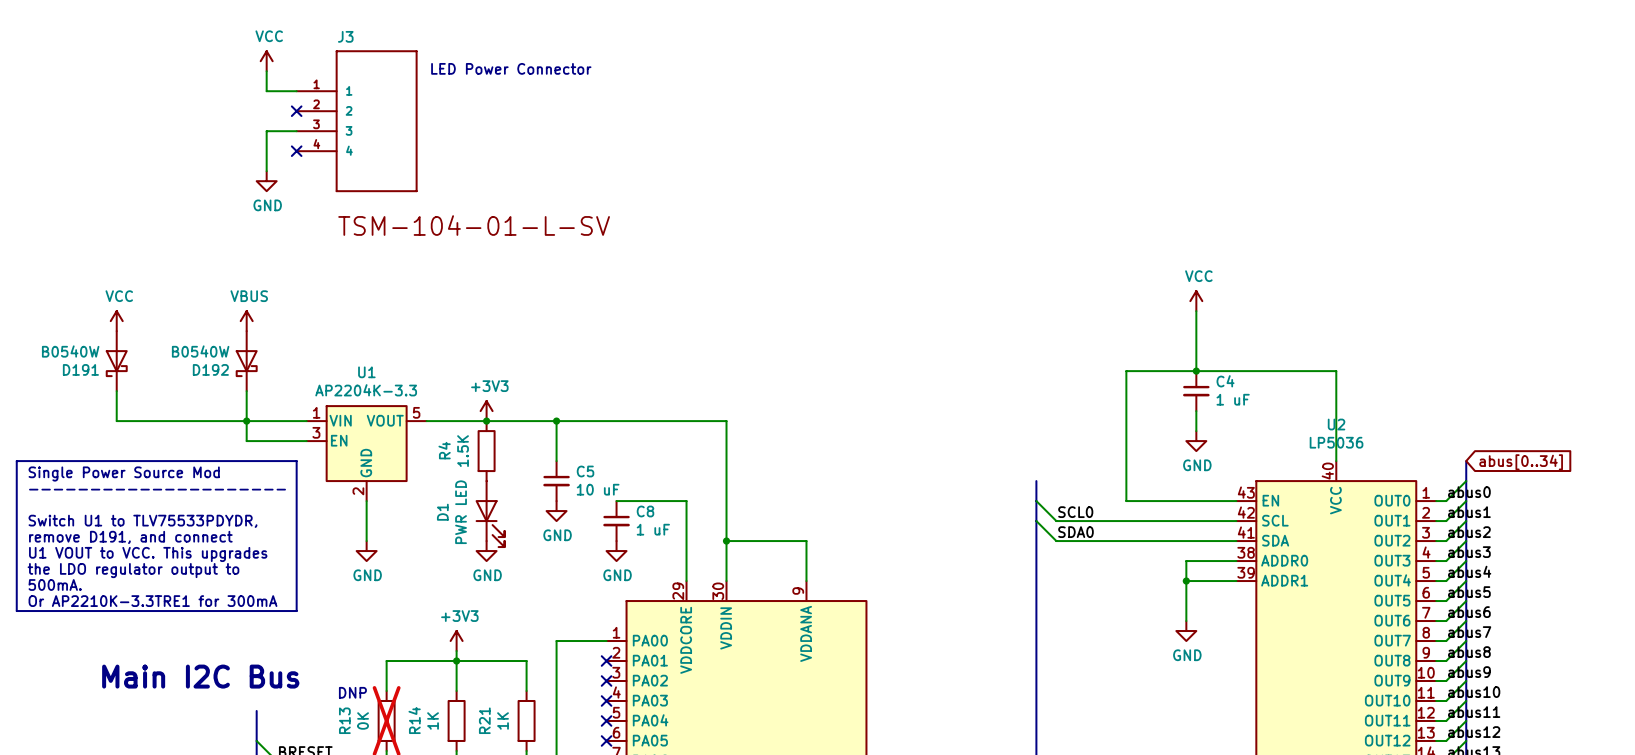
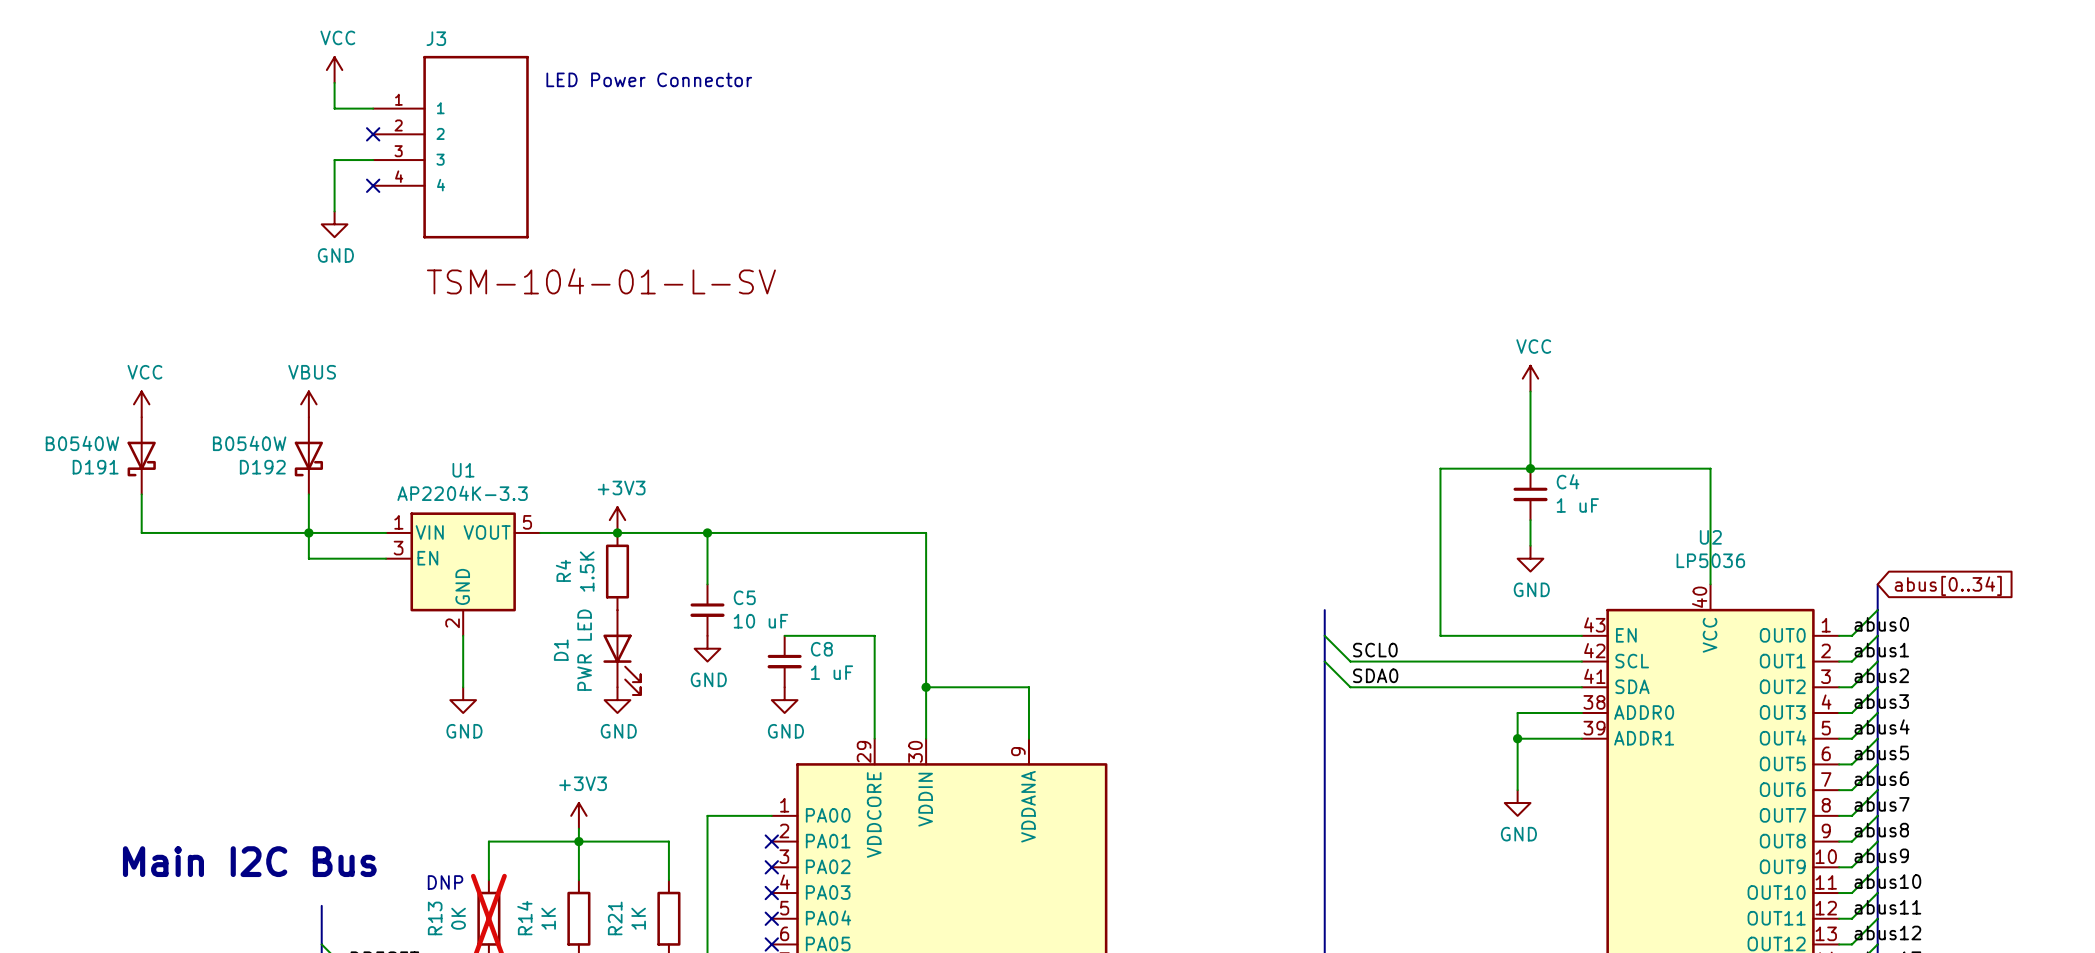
line: (16, 461) (296, 461) (296, 611) (16, 611) (16, 461) -> none
text: Single Power Source Mod (124, 474) -> none
text: --------------------- (157, 489) -> none
text: Switch U1 to TLV75533PDYDR, (142, 521) -> none
text: remove D191, and connect (130, 537) -> none
text: U1 VOUT to VCC. This upgrades (148, 554) -> none
text: the LDO regulator output to (133, 570) -> none
text: 500mA. (55, 584) -> none
text: Or AP2210K-3.3TRE1 for 300mA (152, 601) -> none

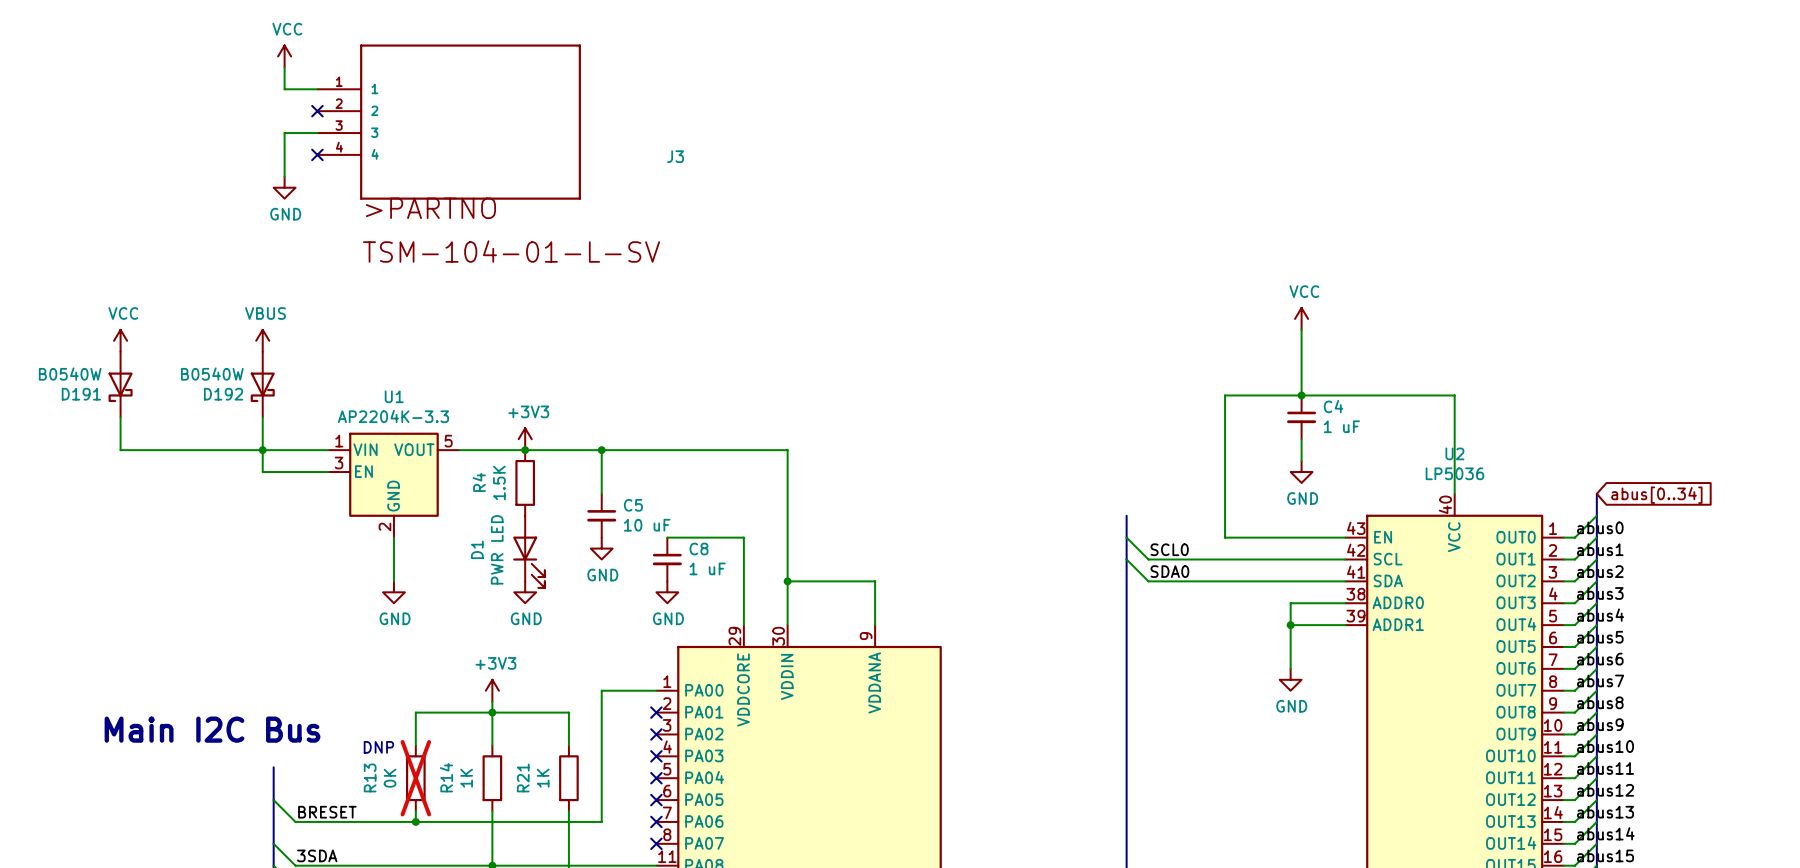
J3 name position: J3 (436, 38) -> J3 (675, 156)
J3 symbol: [373, 55, 529, 239] -> [317, 44, 581, 200]
text: LED Power Connector (649, 79) -> none

